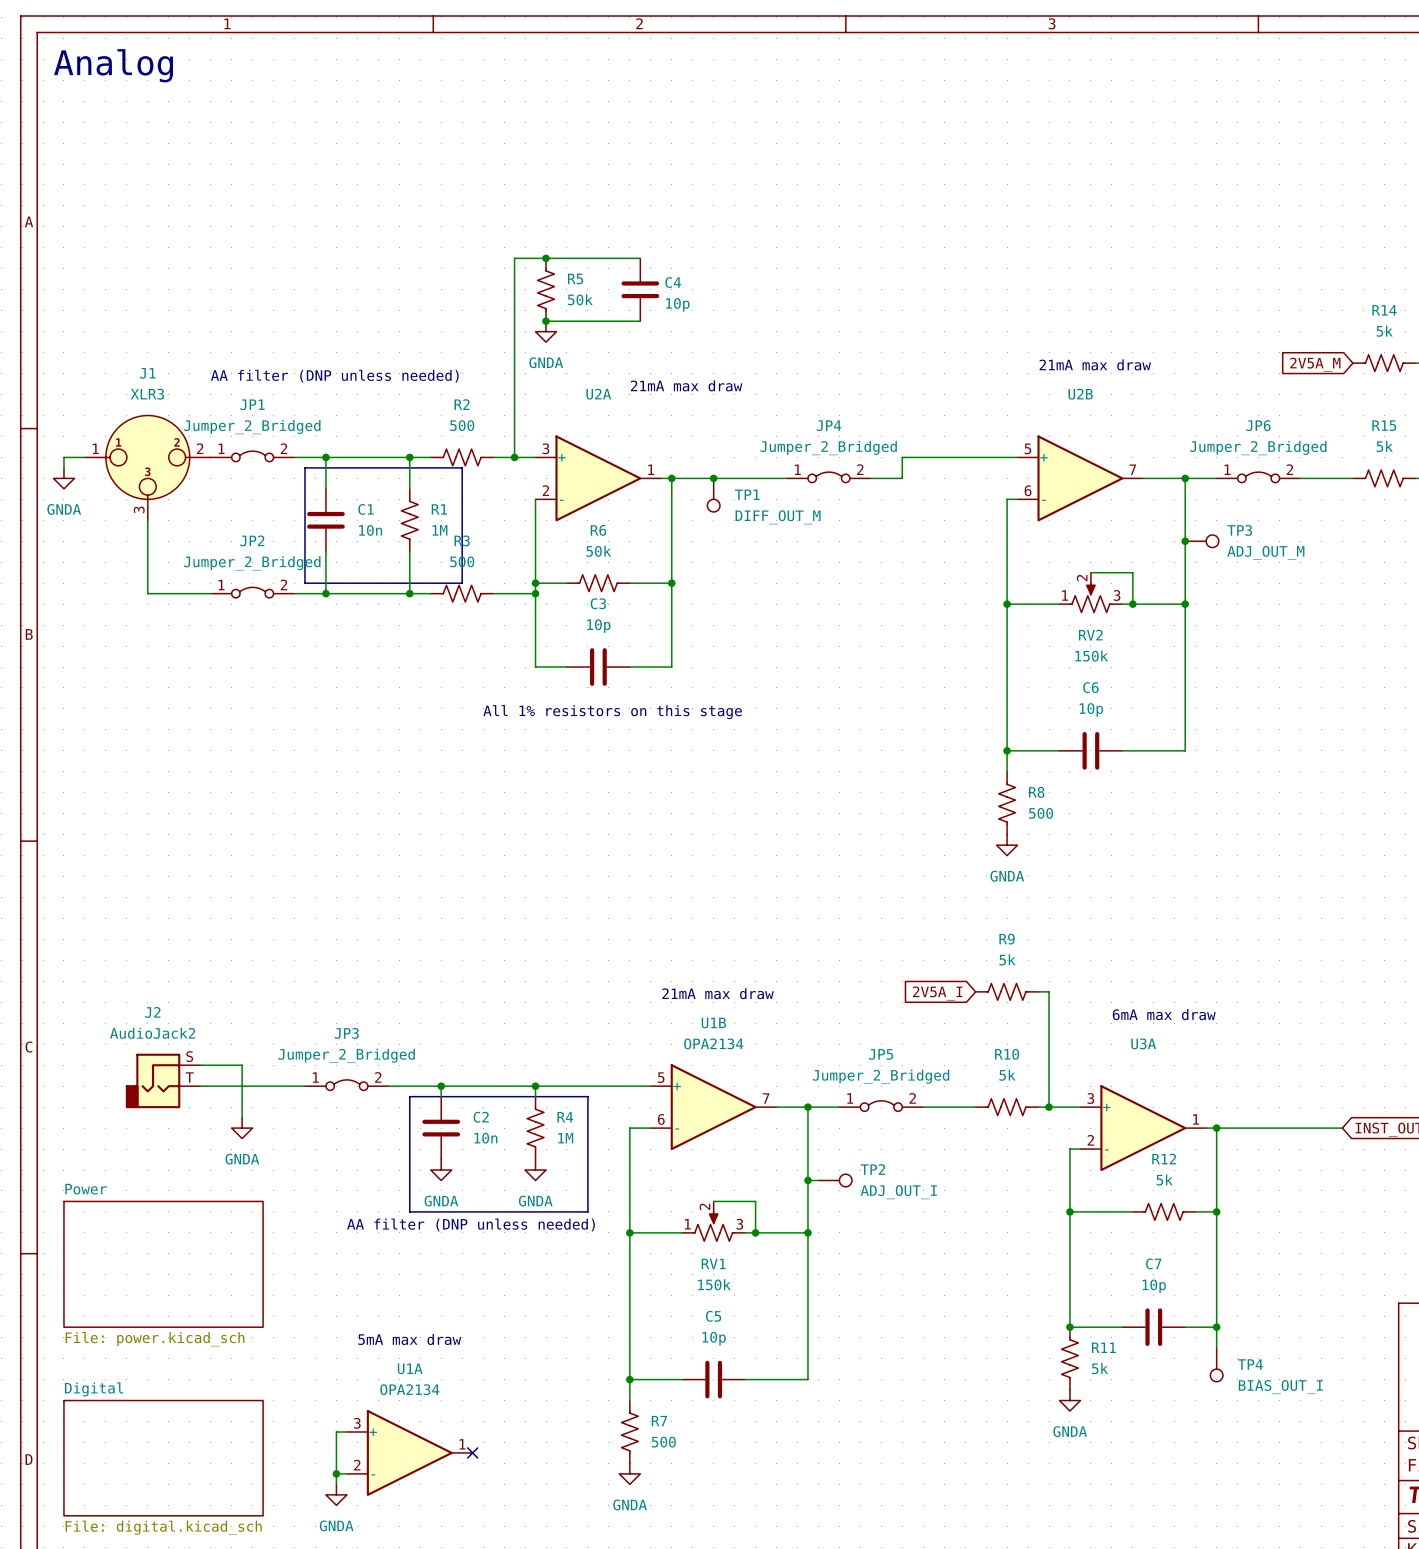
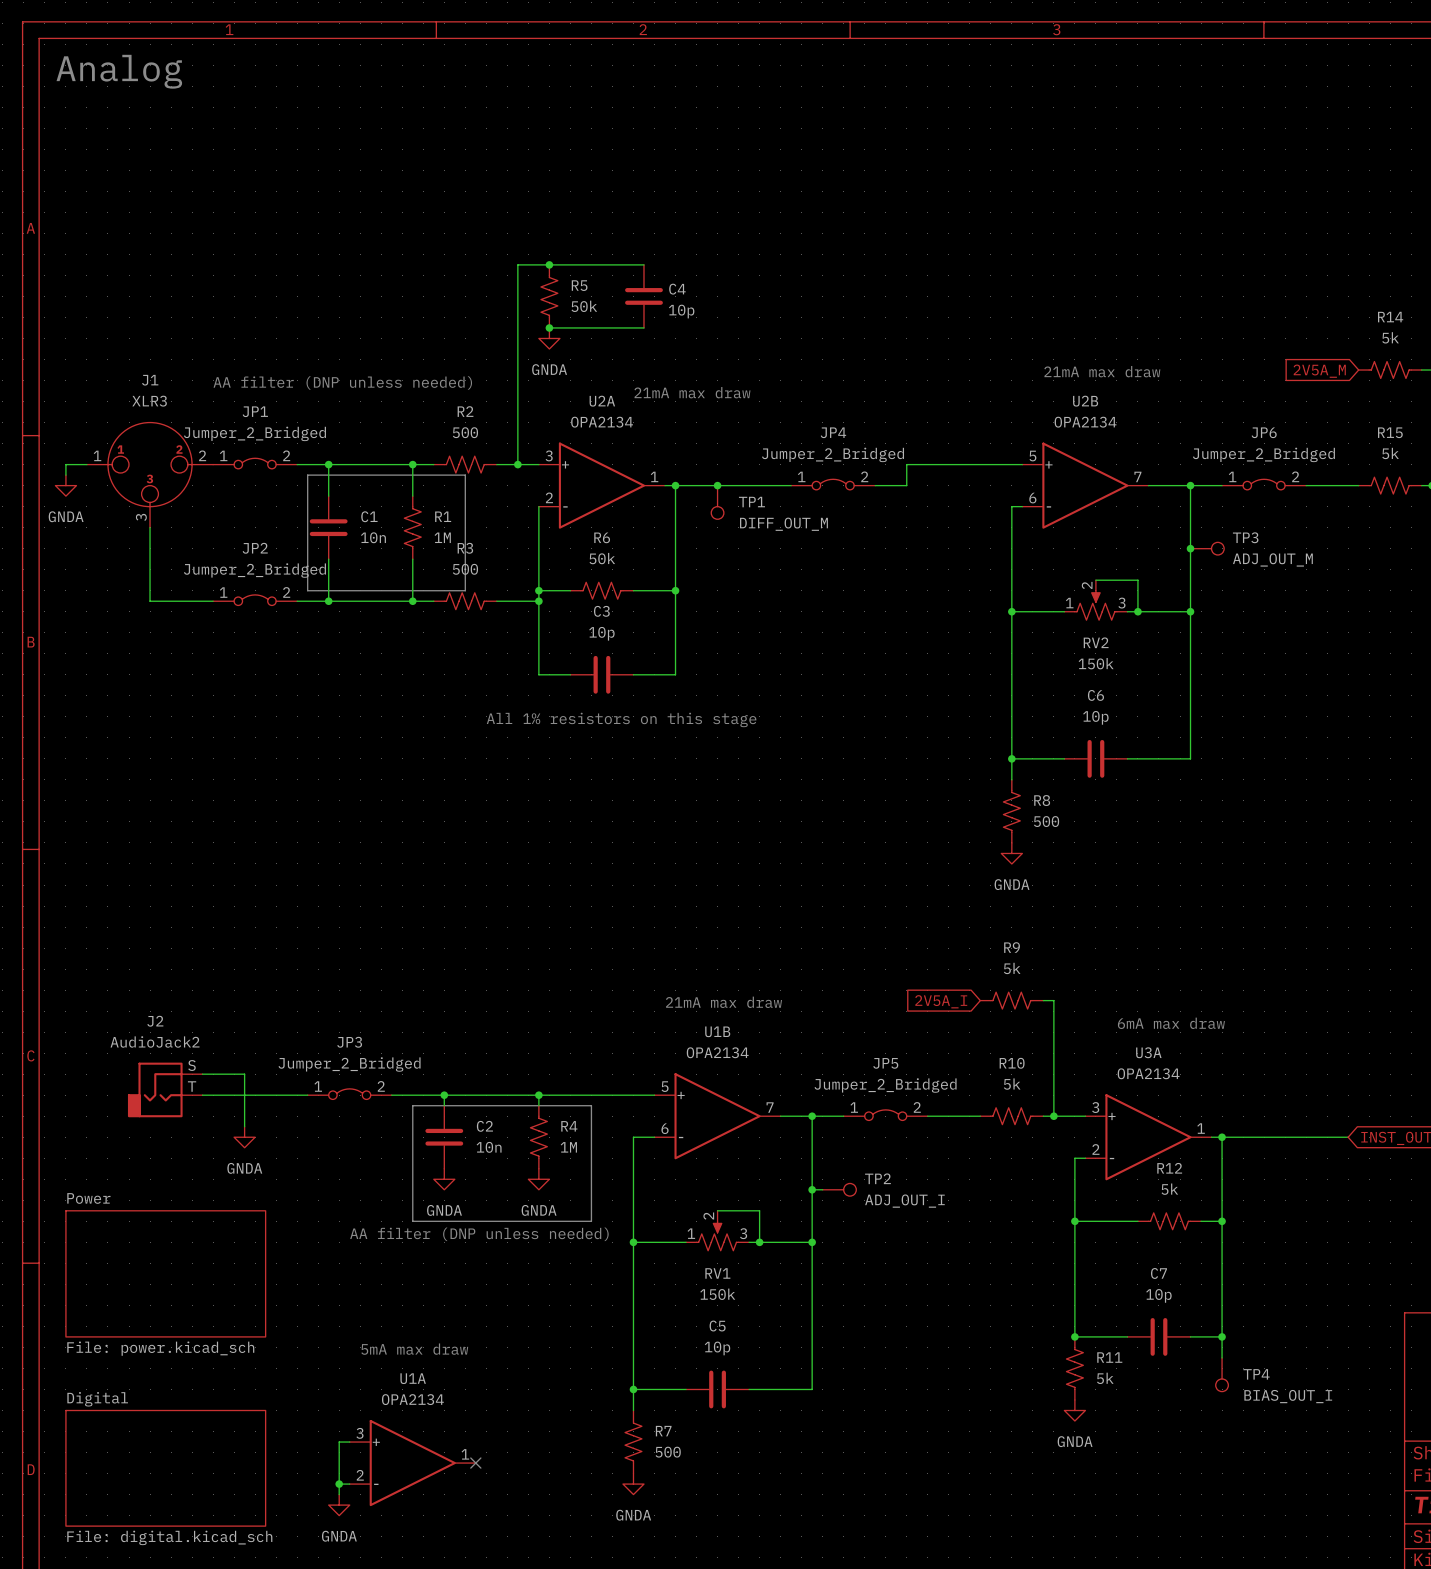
U2A value: none -> OPA2134 (602, 422)
U2B value: none -> OPA2134 (1085, 422)
U3A value: none -> OPA2134 (1148, 1073)

